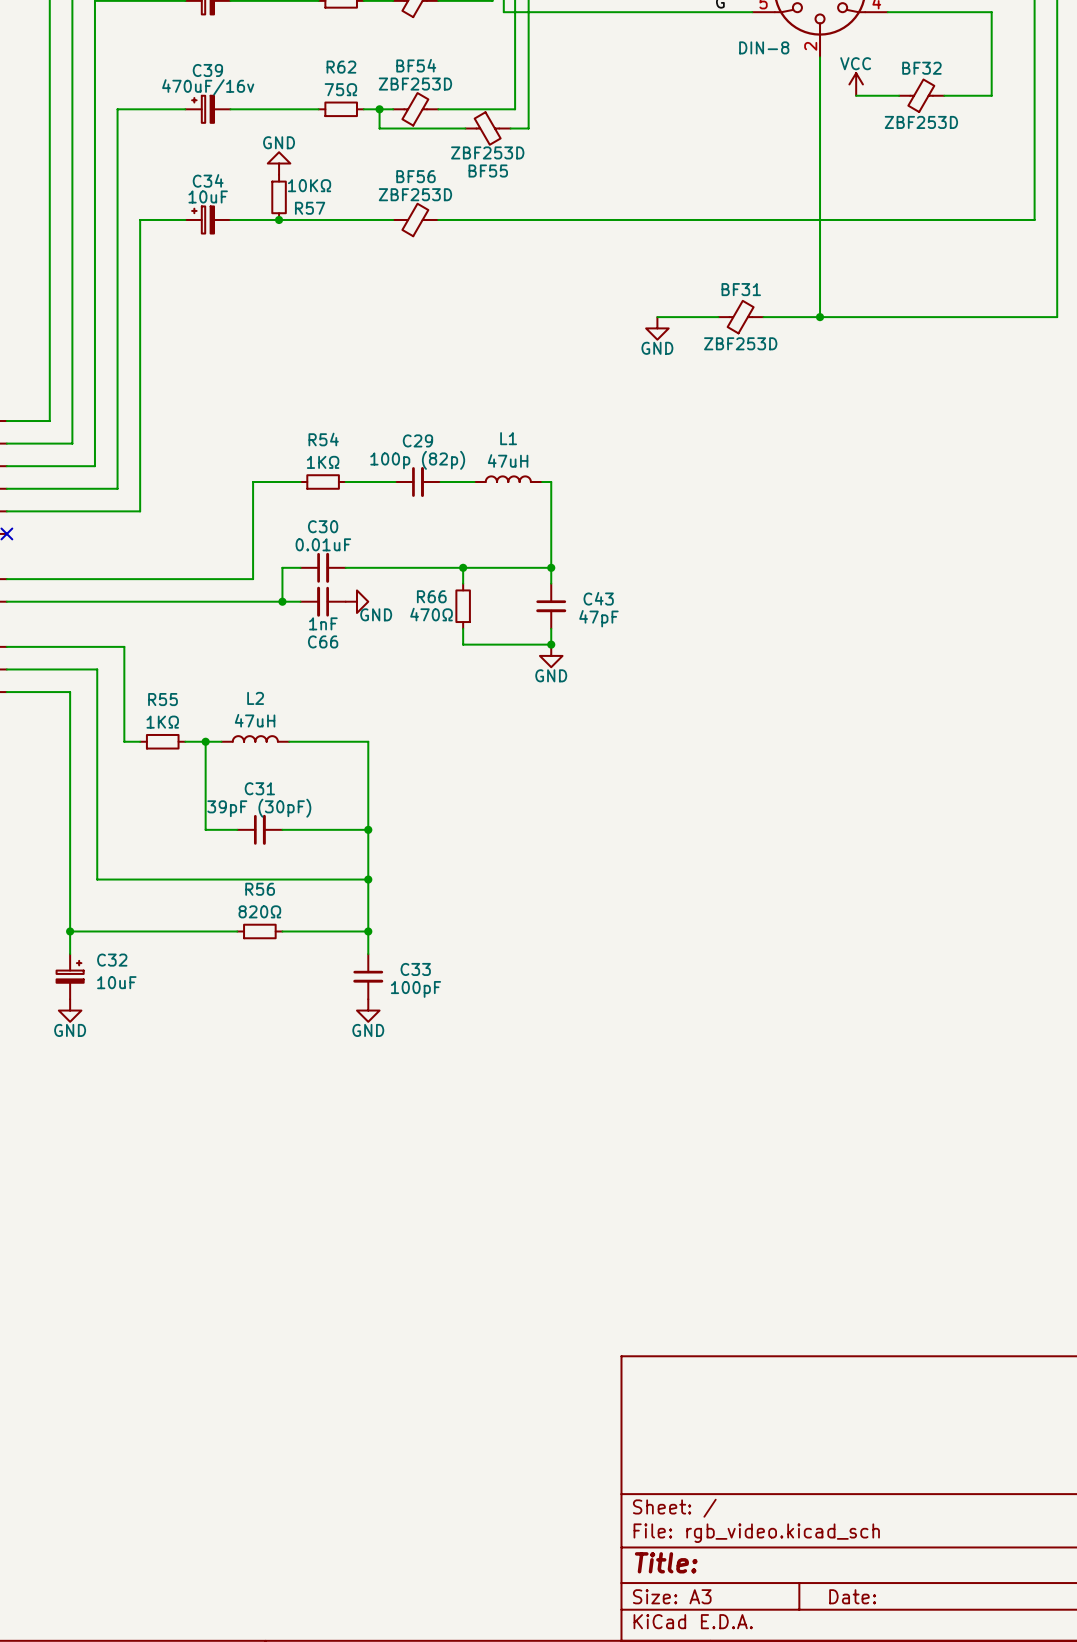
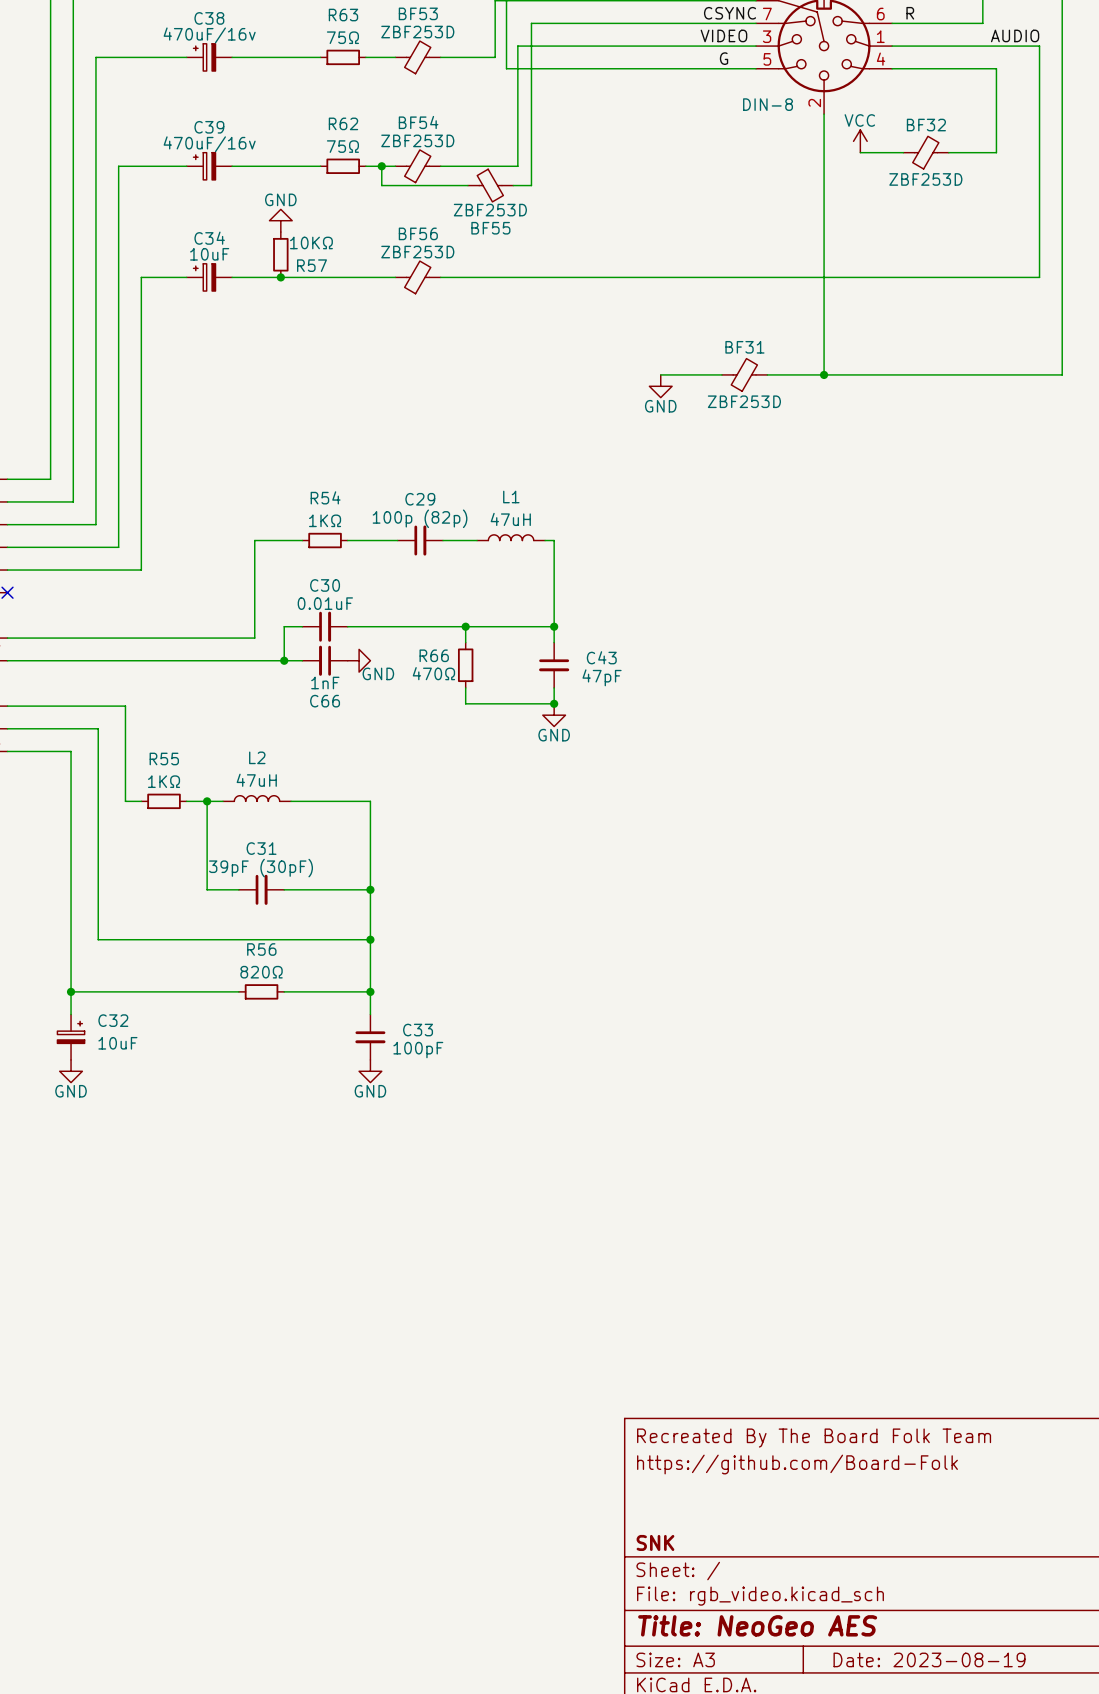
title block: none -> Recreated By The Board Folk Team (814, 1438)
title block: none -> https://github.com/Board-Folk (797, 1464)
title block: none -> SNK (655, 1542)
title block: Title: (666, 1562) -> Title: NeoGeo AES (757, 1625)
title block: Date: (852, 1596) -> Date: 2023-08-19 (929, 1659)

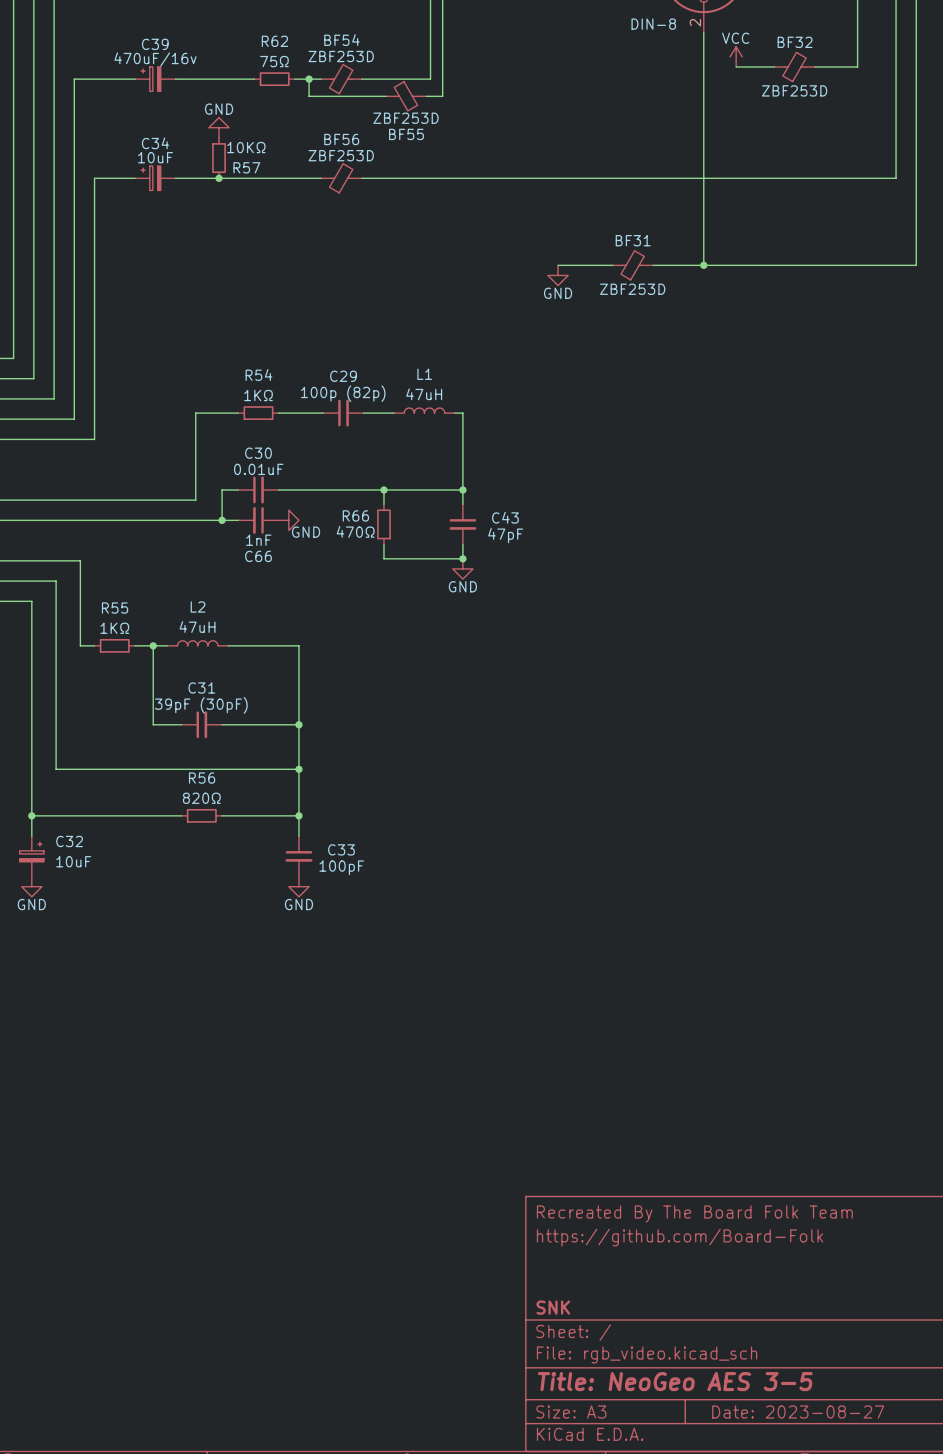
title block: Title: NeoGeo AES (757, 1625) -> Title: NeoGeo AES 3-5 (675, 1381)
title block: Date: 2023-08-19 (929, 1659) -> Date: 2023-08-27 (798, 1412)

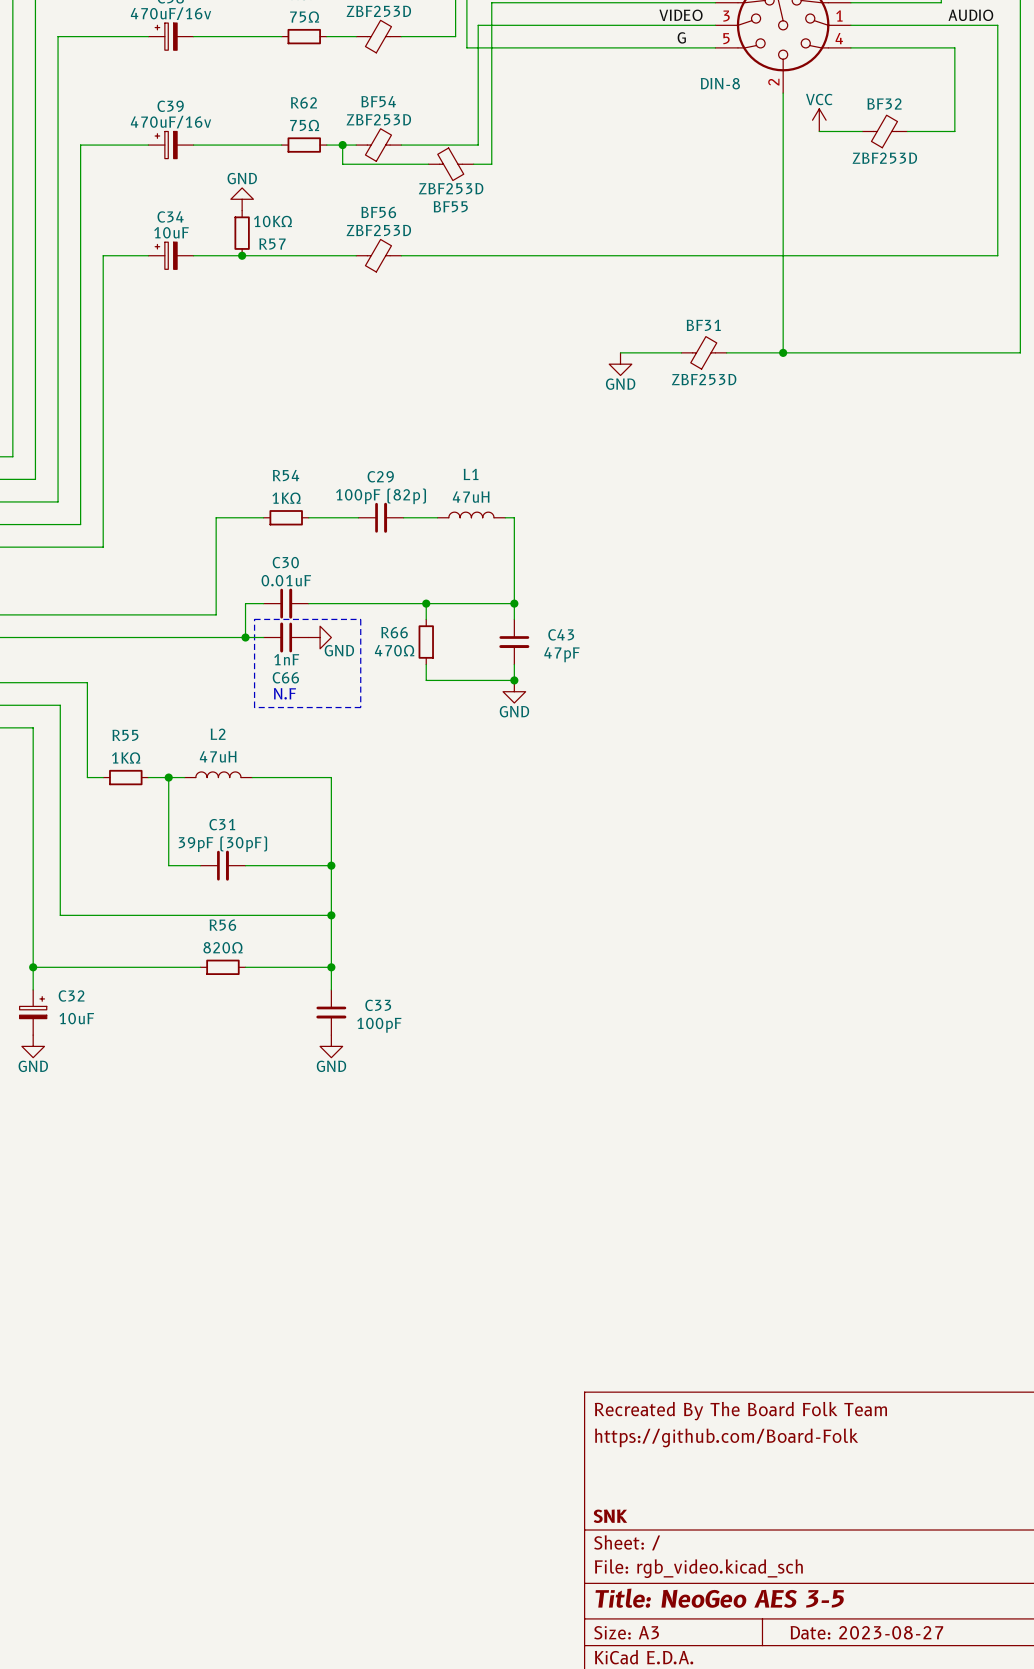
C29 value: 100p (82p) (343, 393) -> 100pF (82p) (381, 496)
line: none -> (254, 619) (360, 619) (360, 707) (254, 707) (254, 619)
text: none -> N.F (284, 693)

